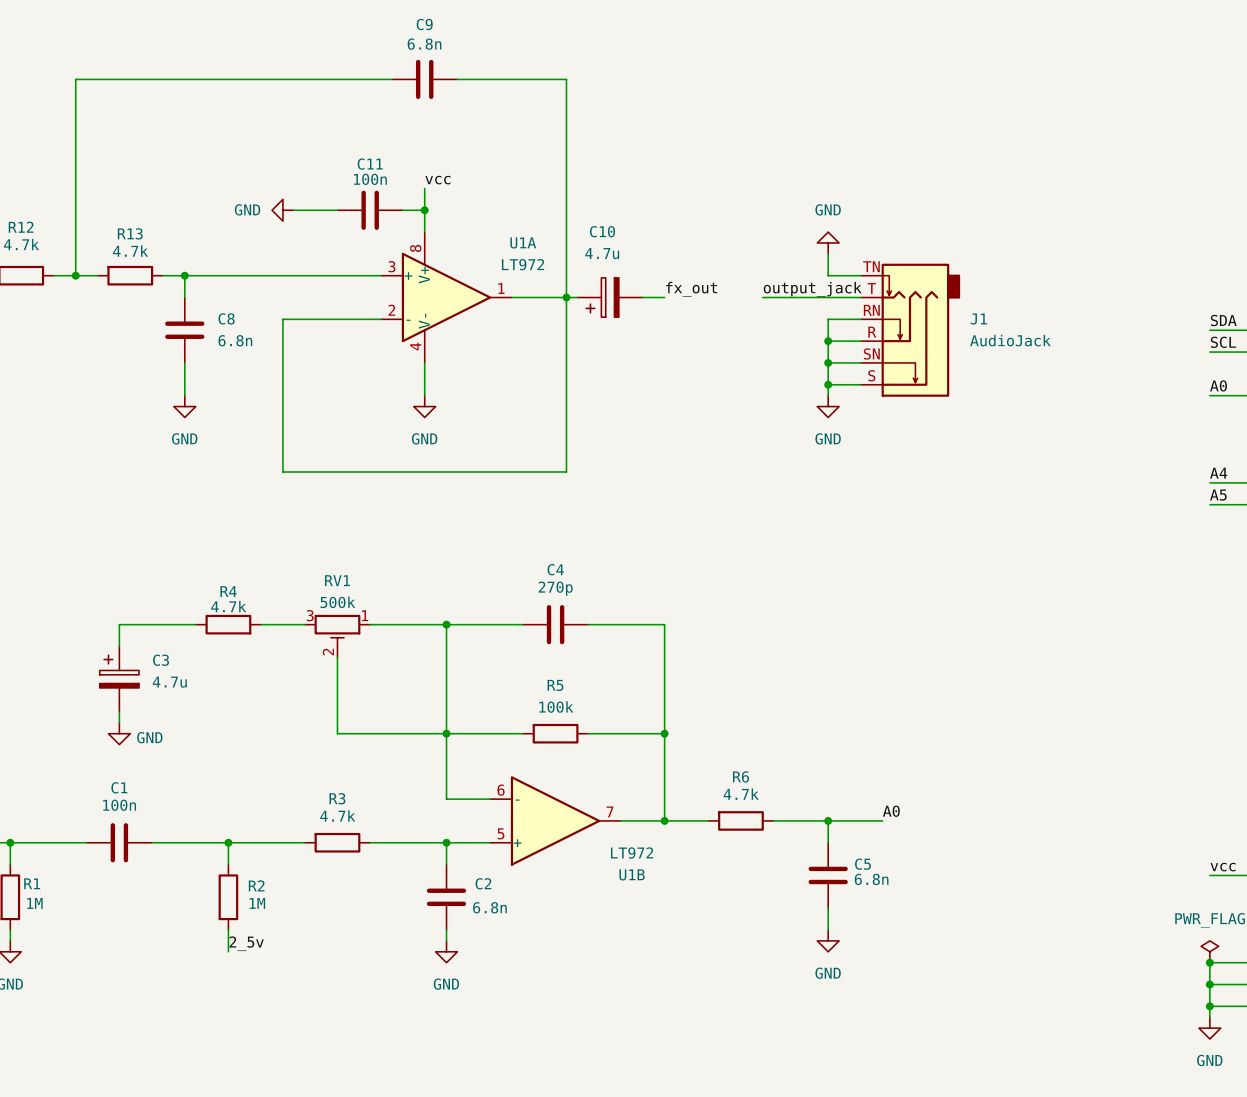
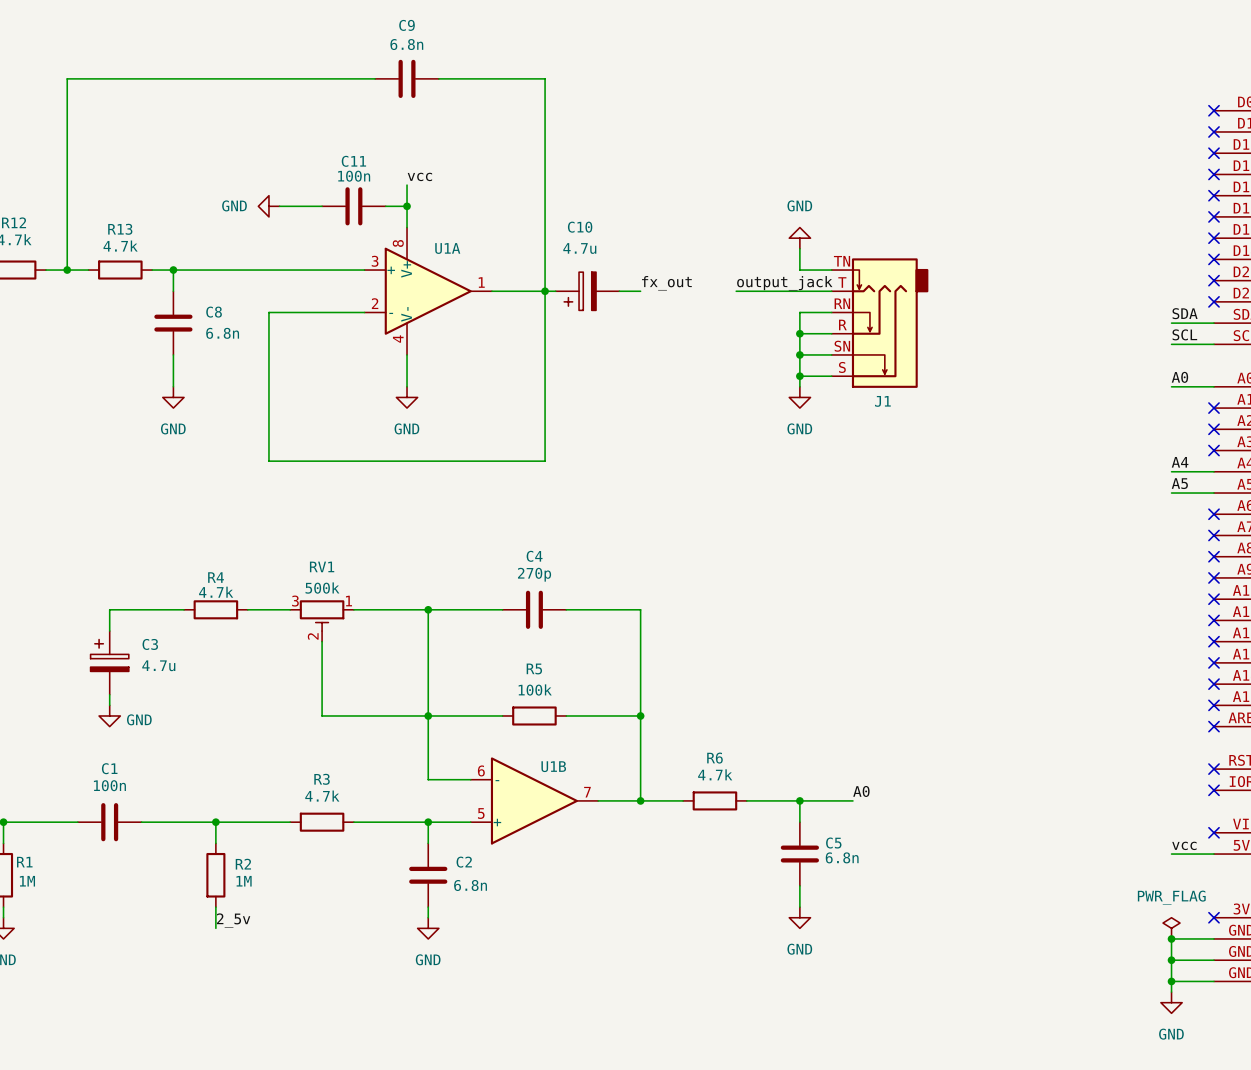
U1A name position: U1A (523, 242) -> U1A (447, 248)
U1A value: LT972 (523, 264) -> none
J1 name position: J1 (978, 319) -> J1 (882, 401)
J1 value: AudioJack (1010, 340) -> none
U1B value: LT972 (632, 852) -> none
U1B name position: U1B (632, 874) -> U1B (553, 766)

